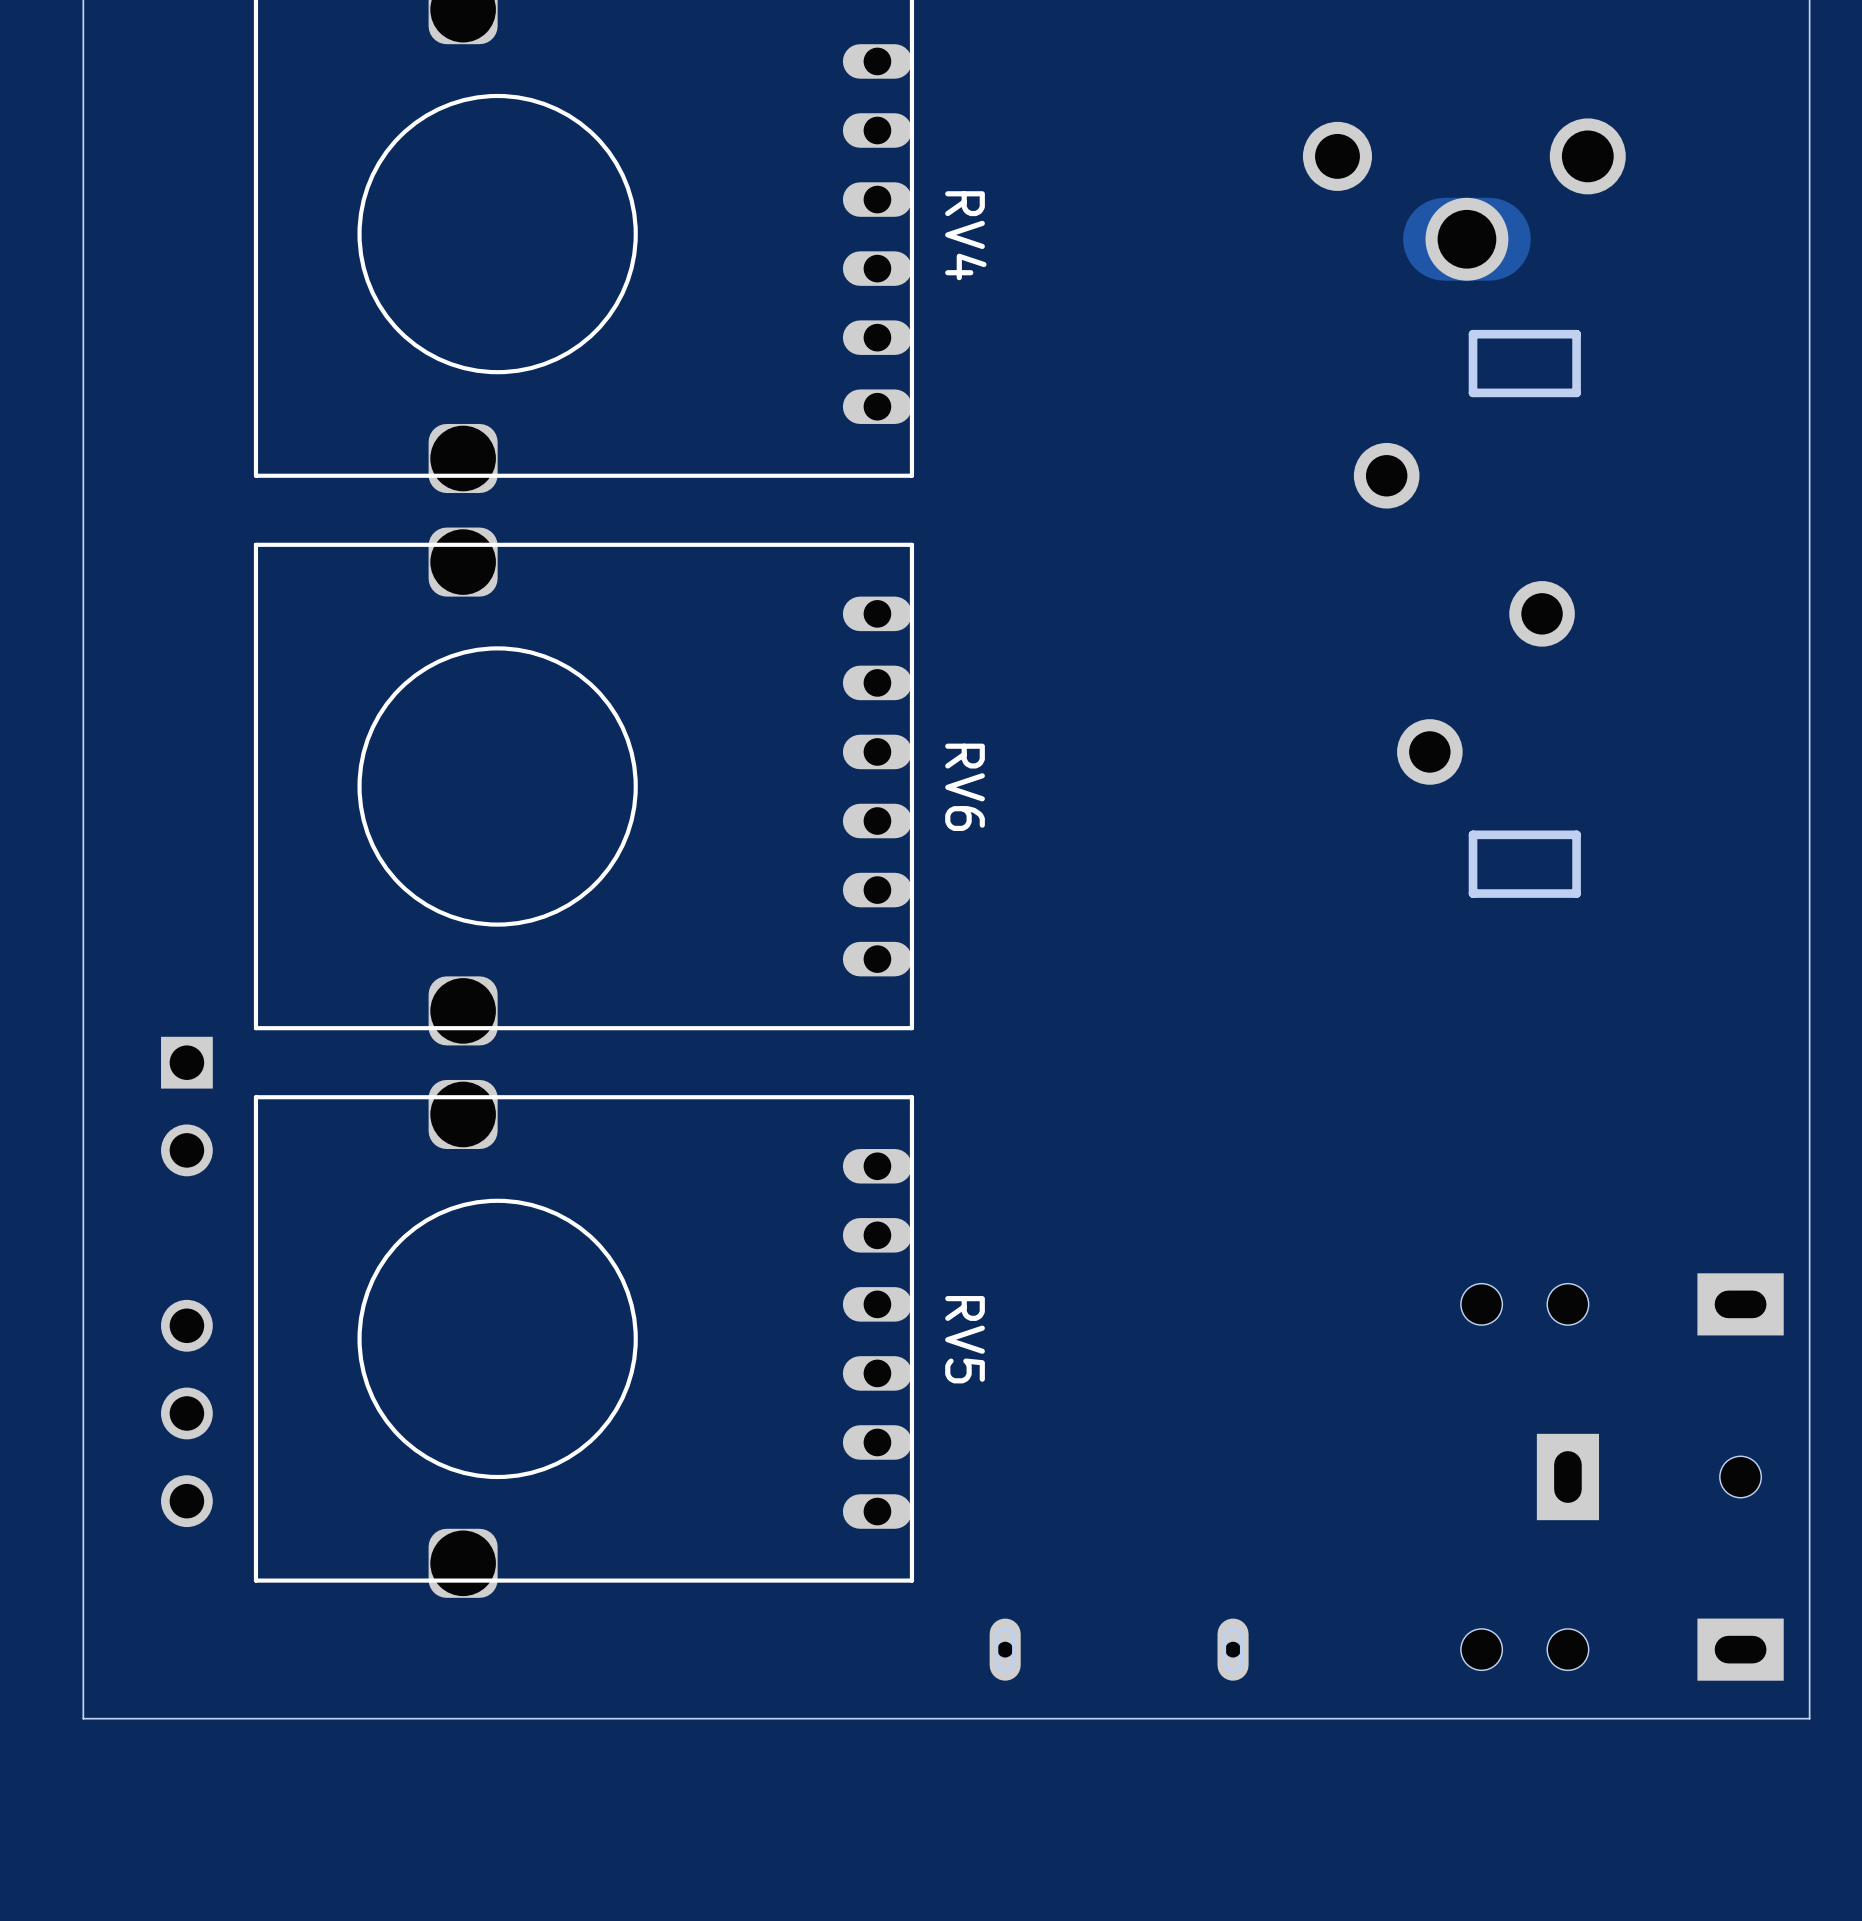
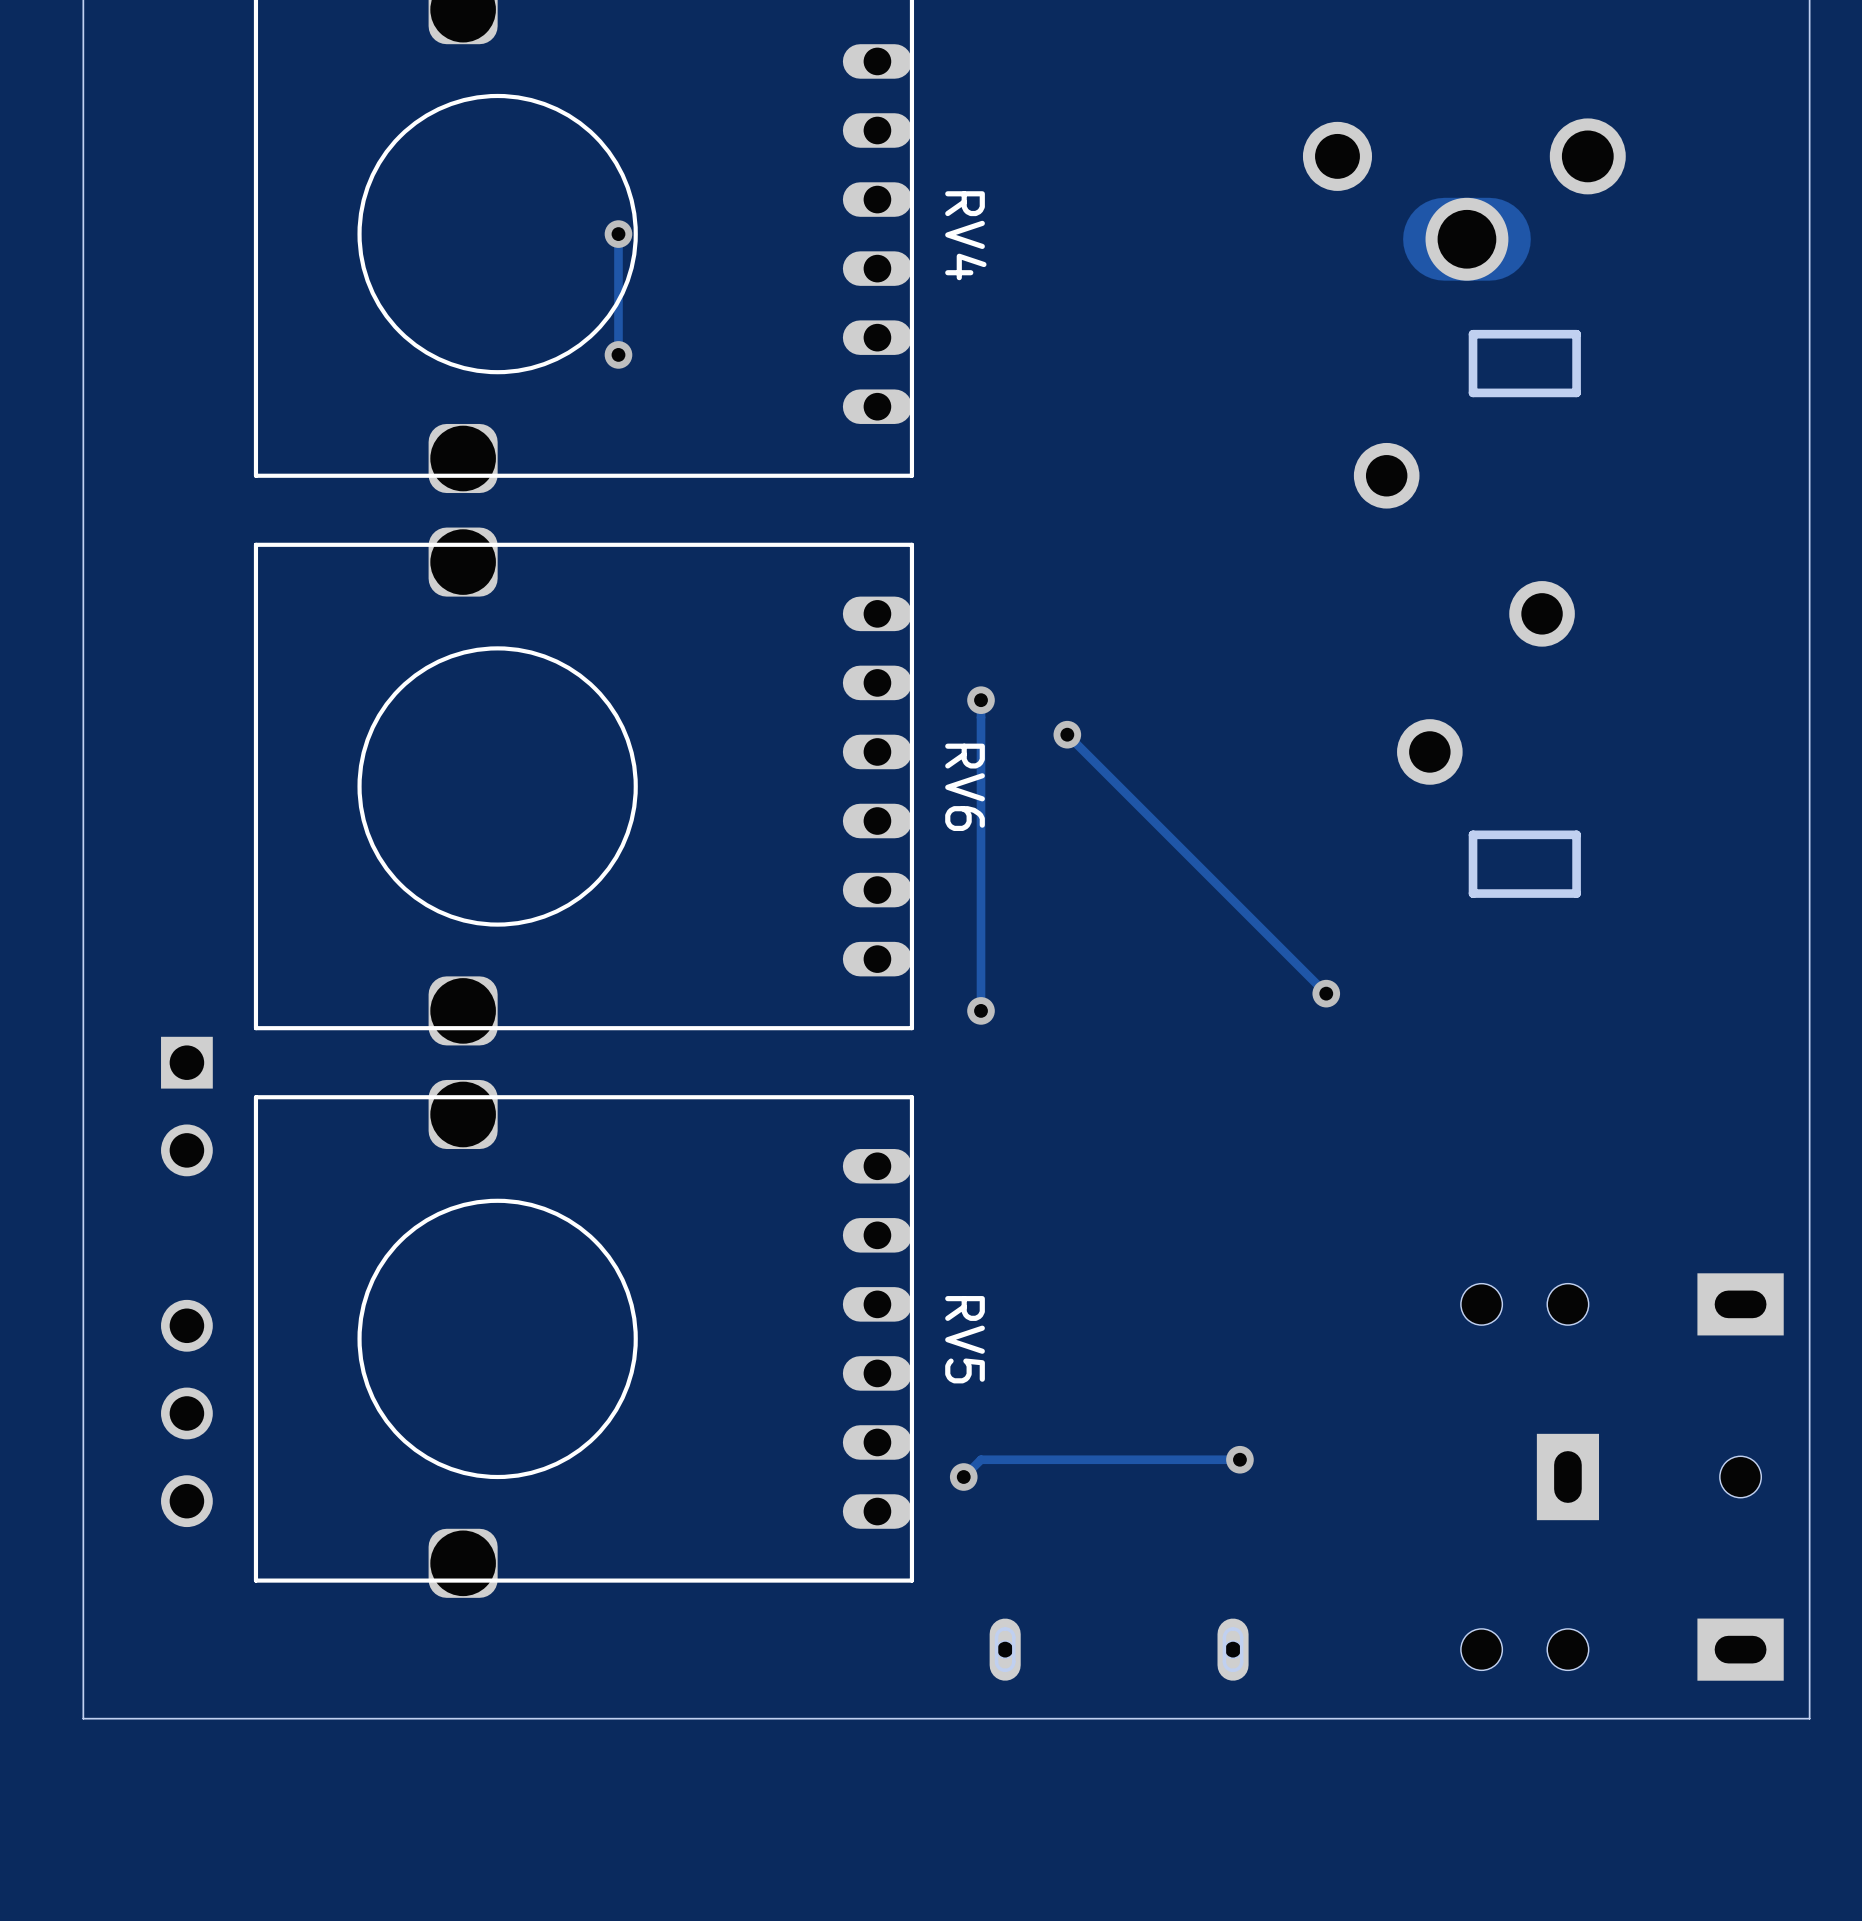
track: none -> (618, 234) (618, 354)
via: none -> (618, 234)
via: none -> (618, 354)
track: none -> (981, 700) (981, 1010)
via: none -> (981, 700)
track: none -> (1067, 734) (1326, 993)
via: none -> (1067, 734)
via: none -> (1326, 993)
via: none -> (981, 1010)
track: none -> (1239, 1459) (981, 1459) (963, 1477)
via: none -> (1239, 1459)
via: none -> (963, 1477)

